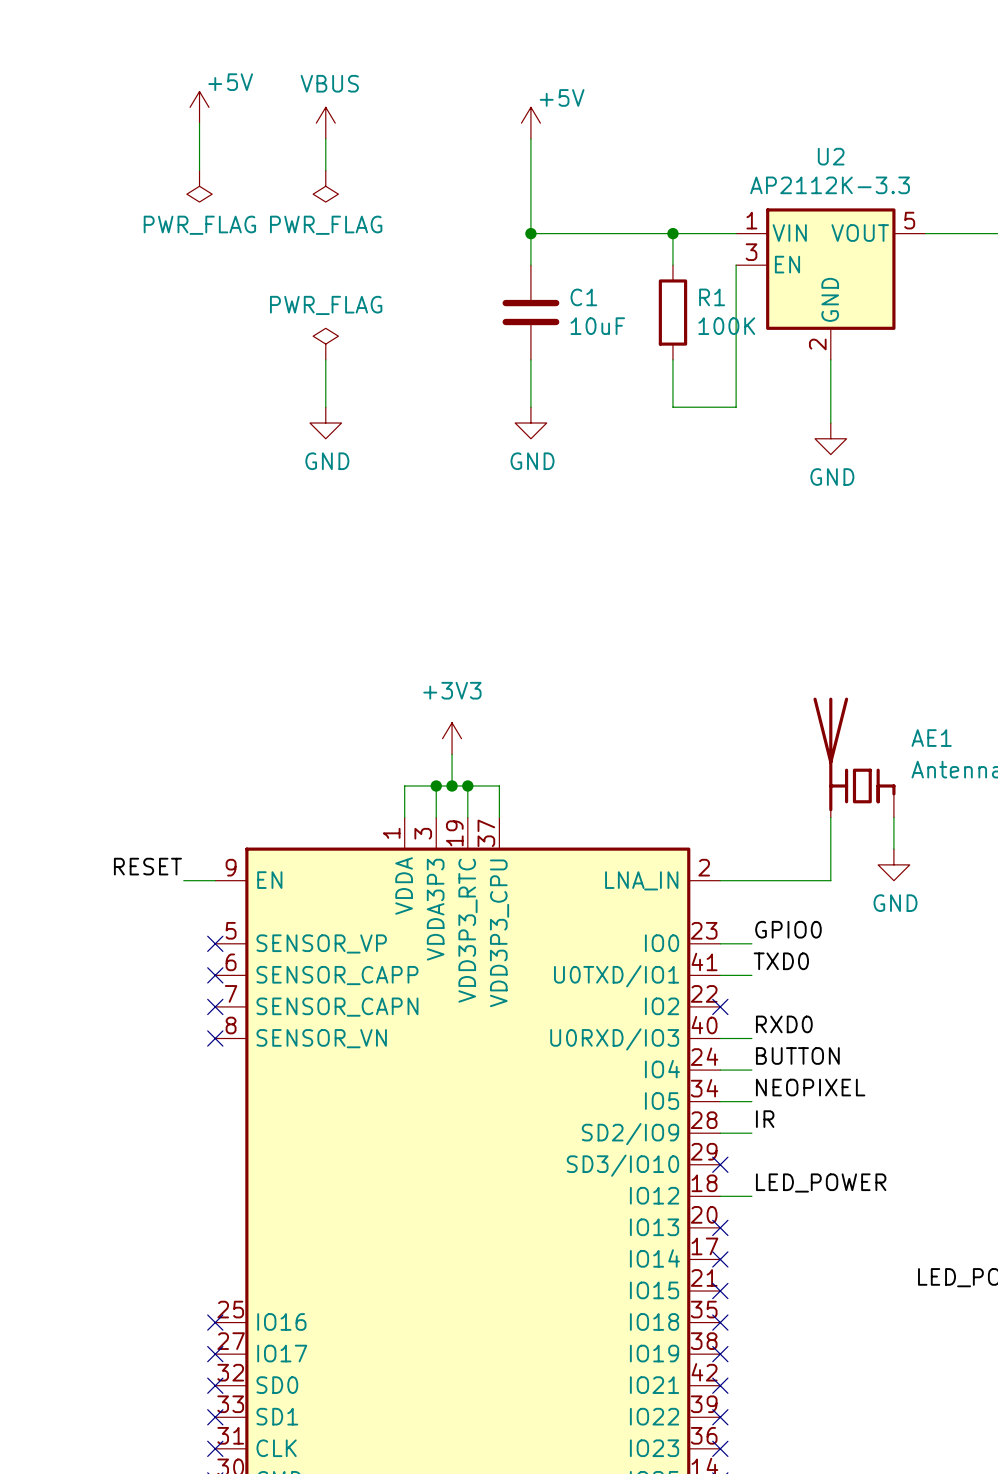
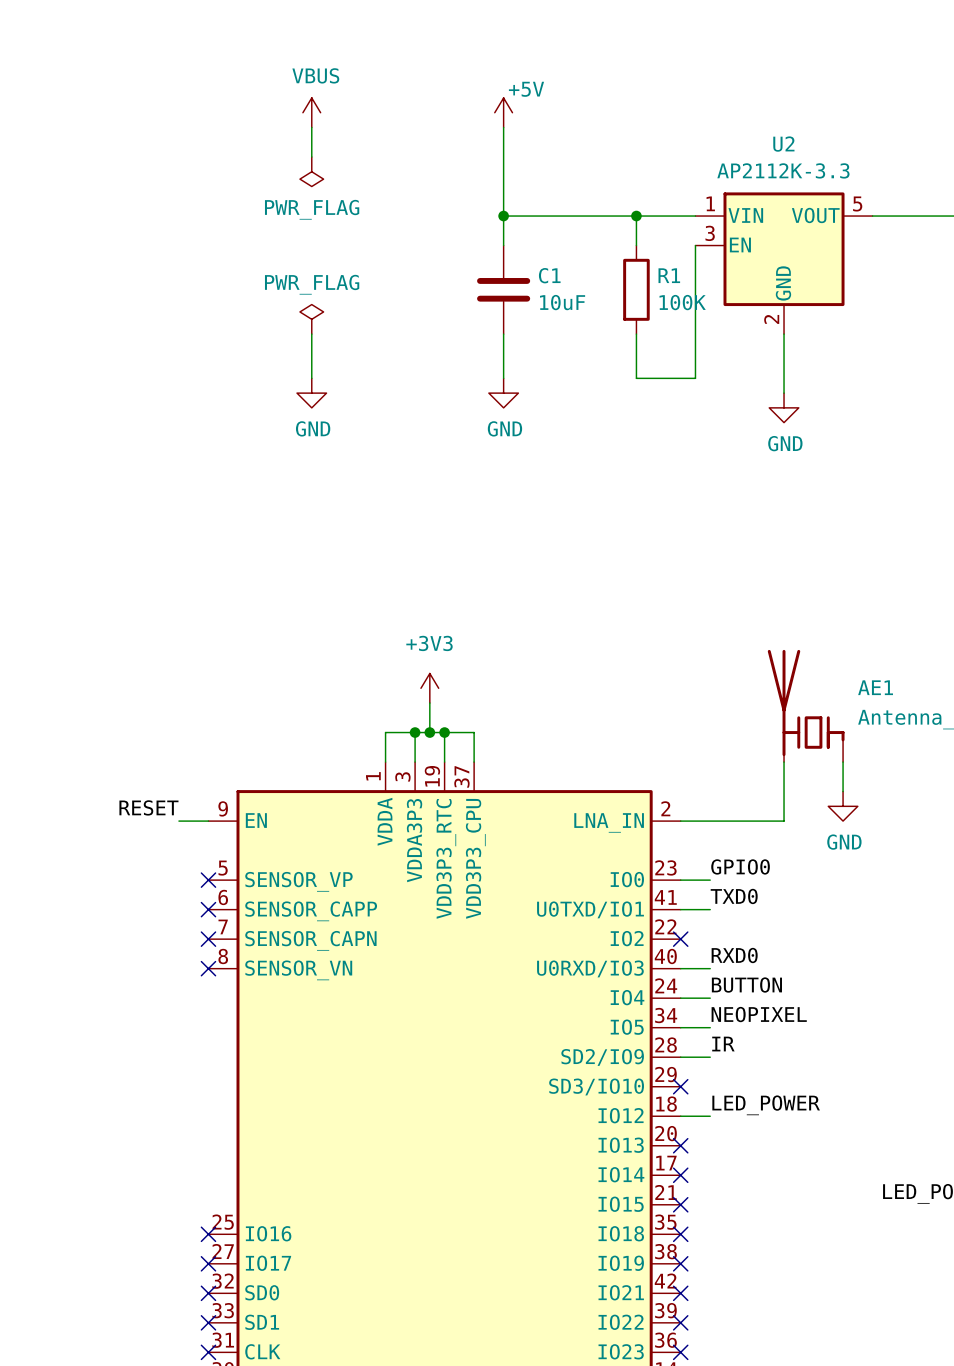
power symbol: +5V (199, 107) -> none
wire: (199, 123) (199, 170) -> none
power symbol: PWR_FLAG (199, 186) -> none

